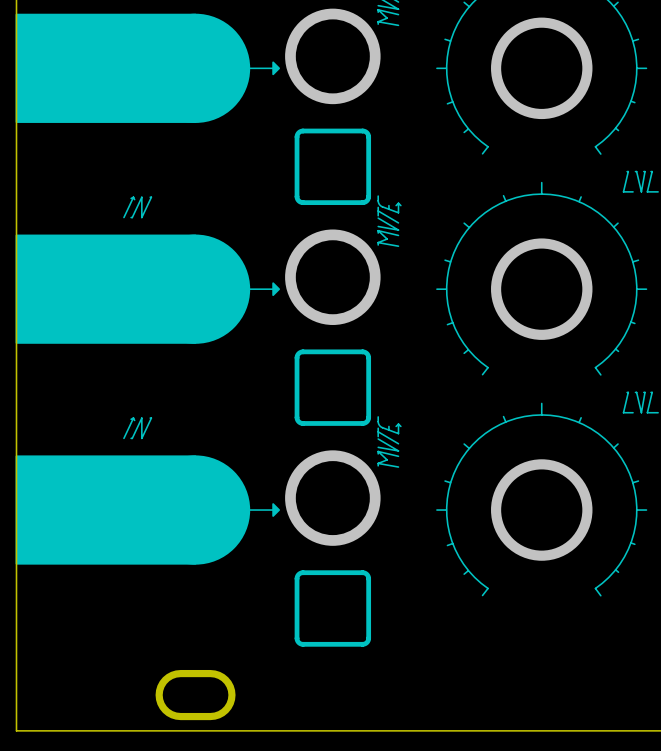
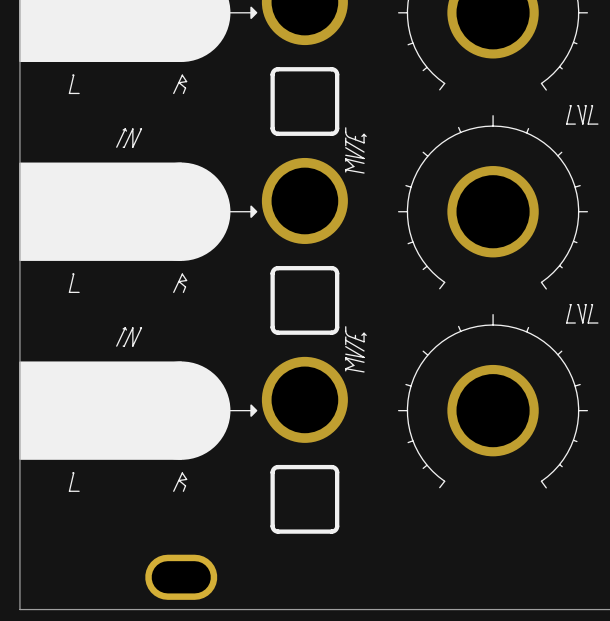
line: none -> (72, 75) (69, 93) (79, 93)
line: none -> (173, 93) (182, 75) (186, 81) (179, 82) (185, 88) (183, 93)
line: none -> (72, 274) (69, 292) (79, 292)
line: none -> (173, 292) (182, 274) (186, 280) (179, 281) (185, 286) (183, 292)
line: none -> (72, 472) (69, 491) (79, 491)
line: none -> (173, 491) (182, 472) (186, 479) (179, 480) (185, 485) (183, 491)

